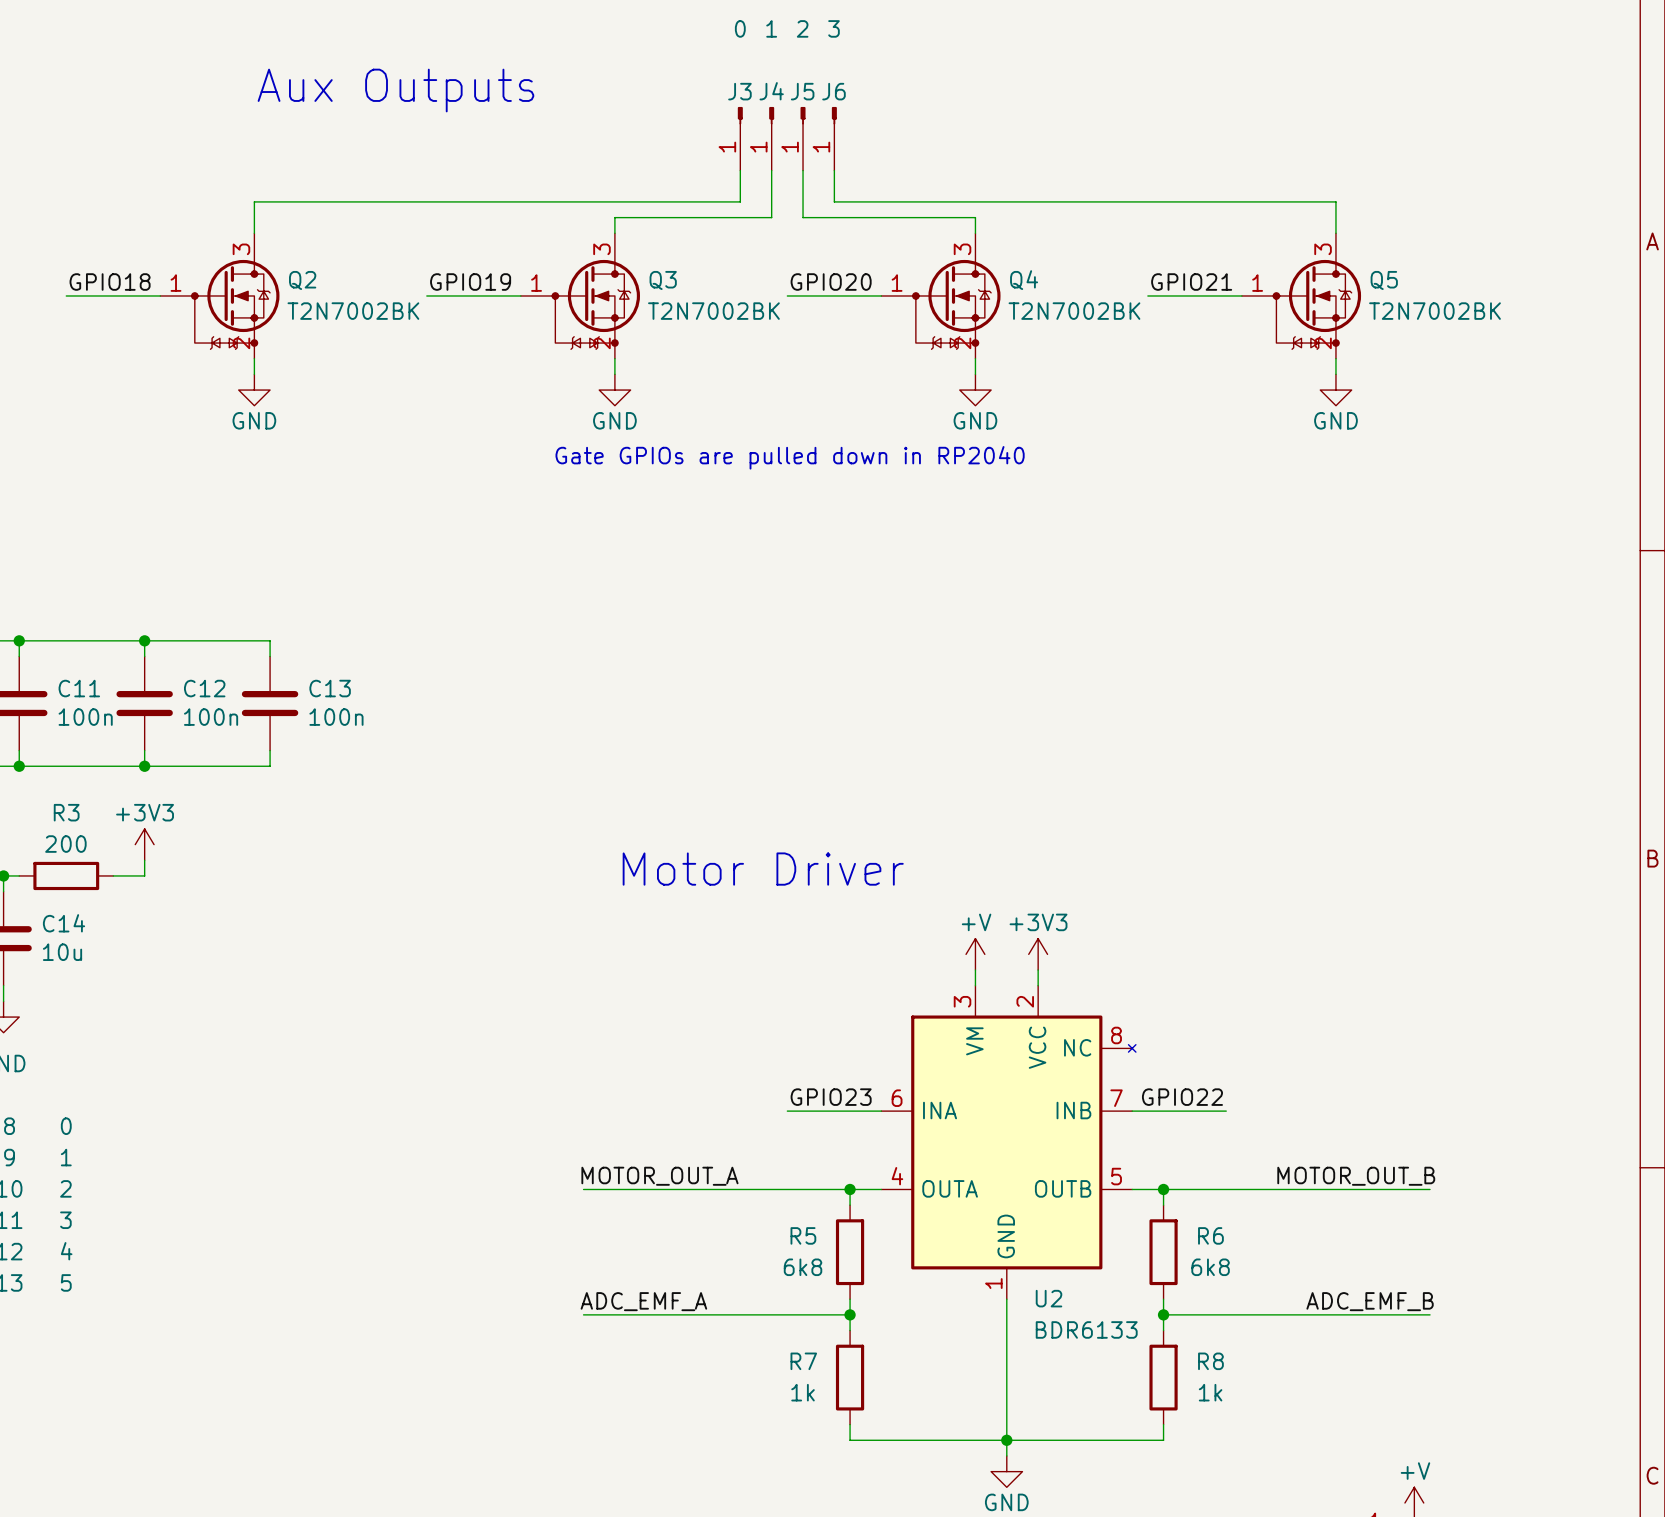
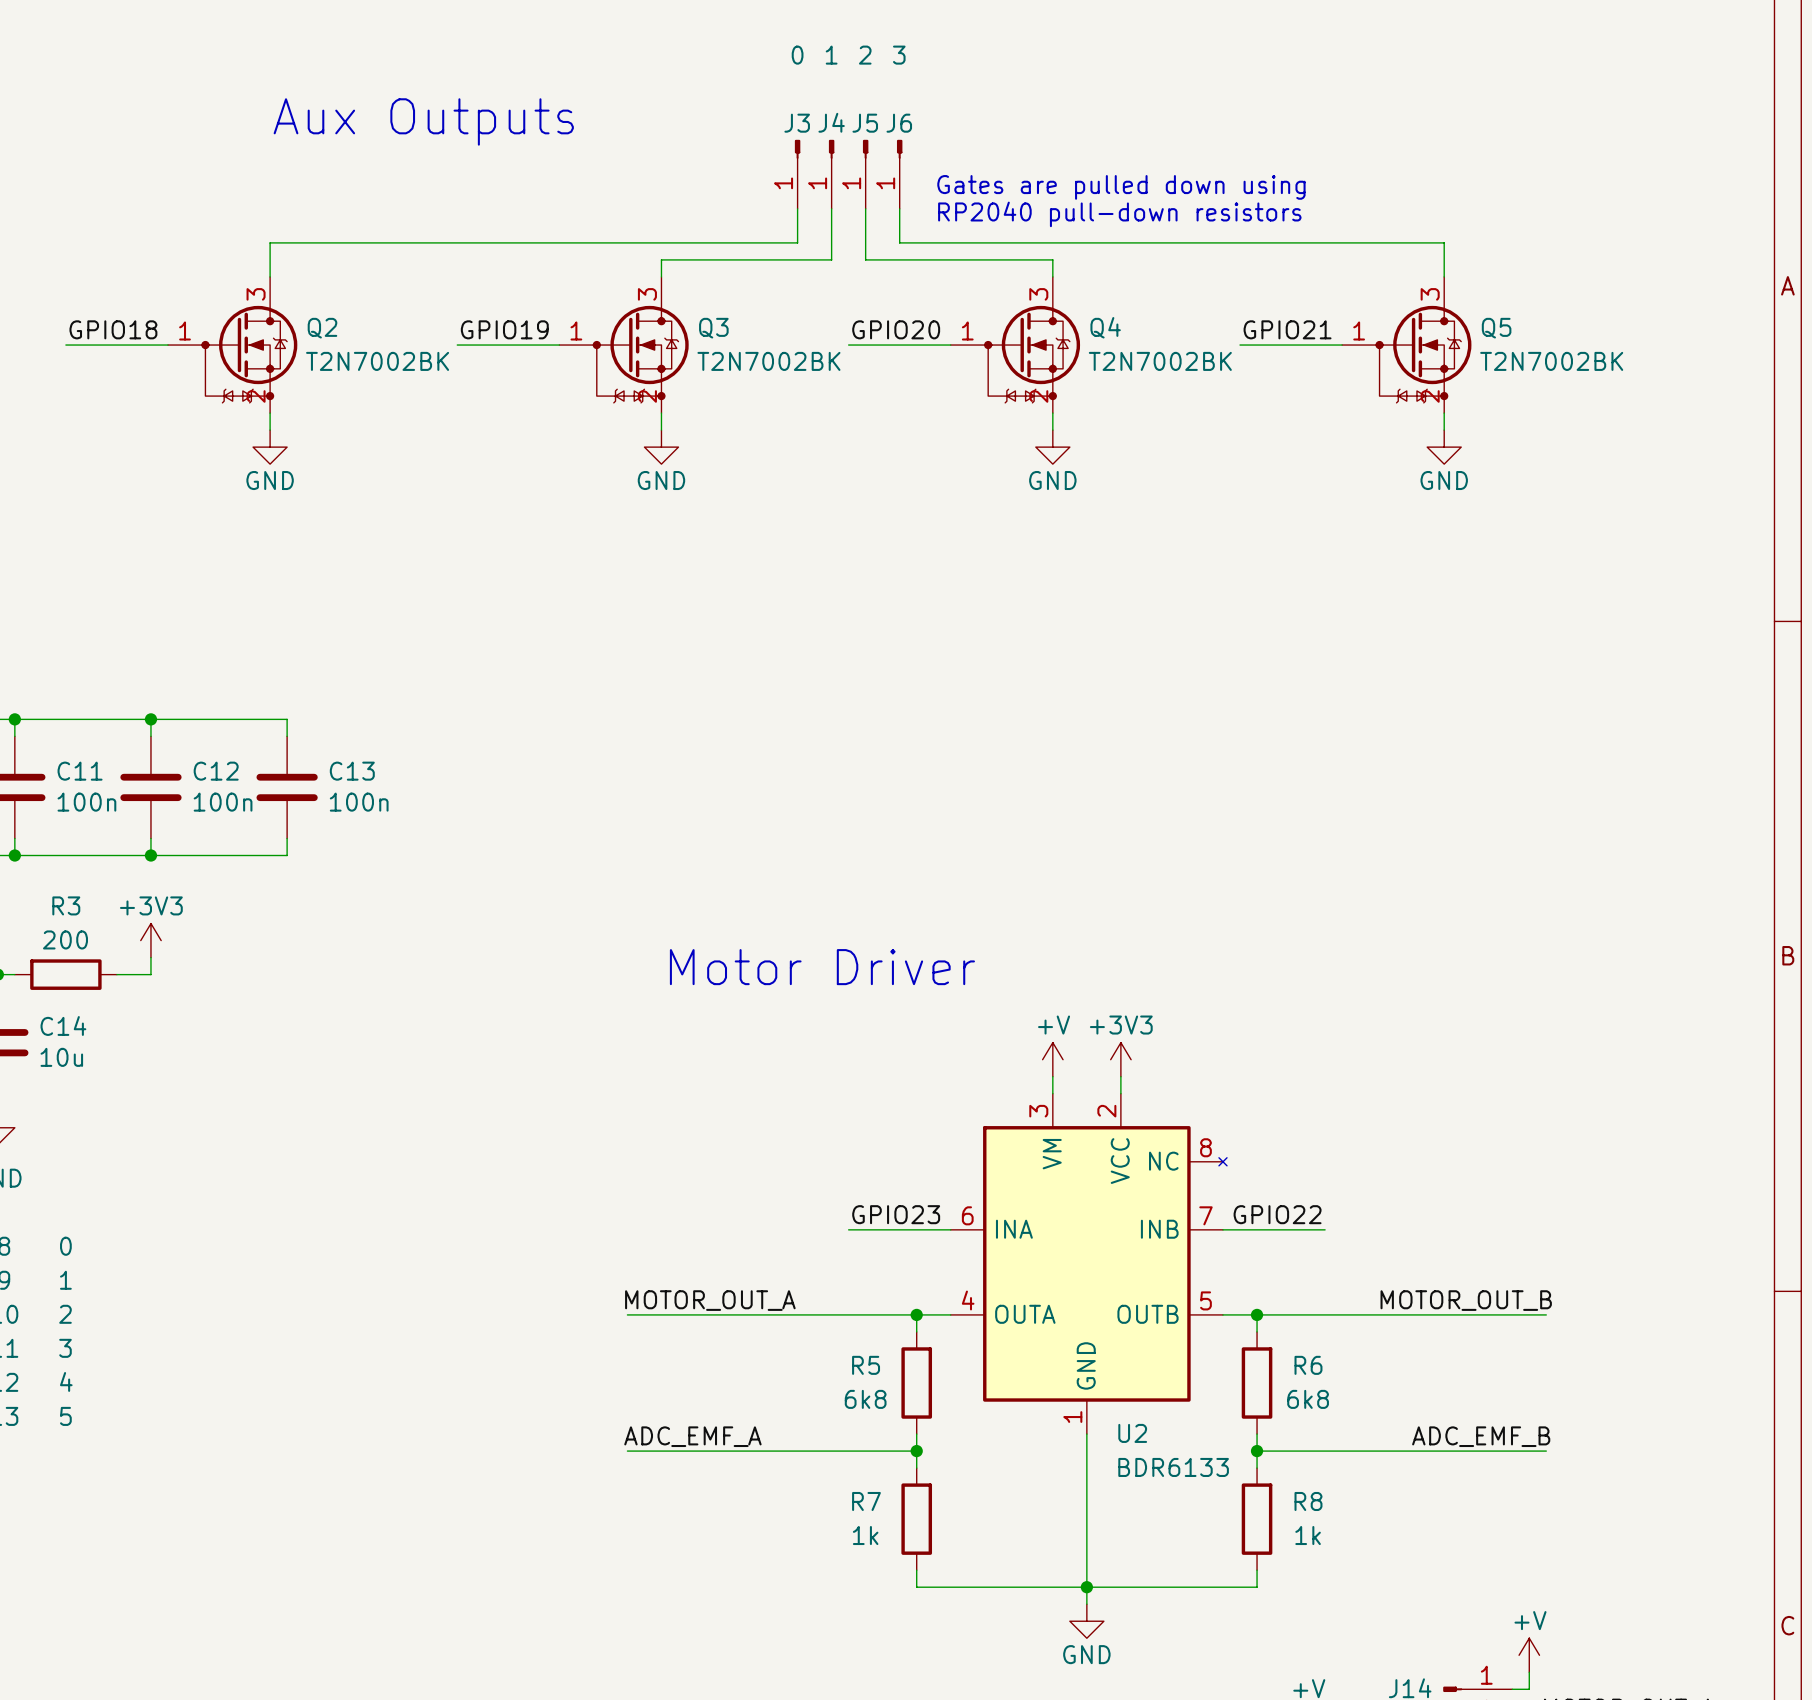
text: none -> Gates are pulled down using (1121, 187)
text: none -> RP2040 pull-down resistors (1119, 214)
text: Gate GPIOs are pulled down in RP2040 (790, 457) -> none

